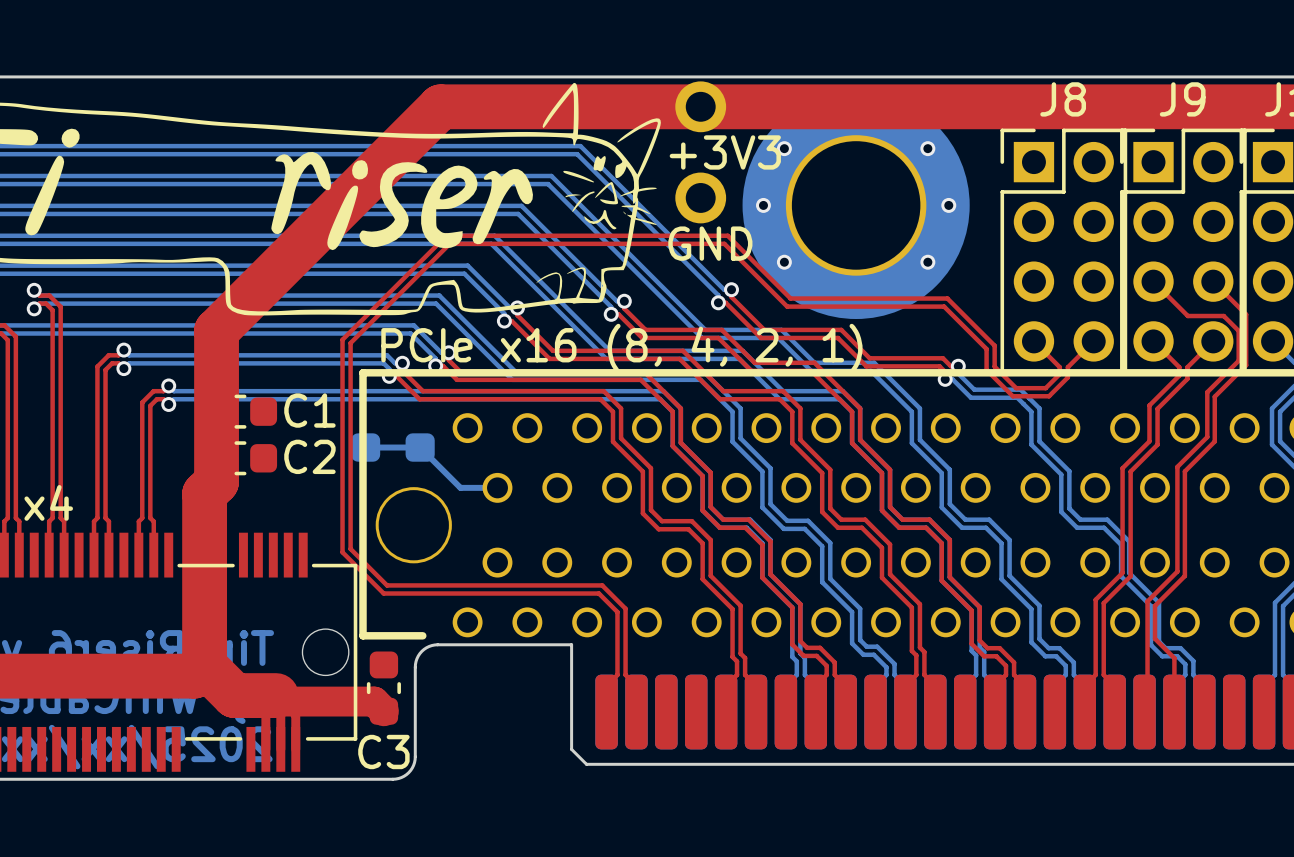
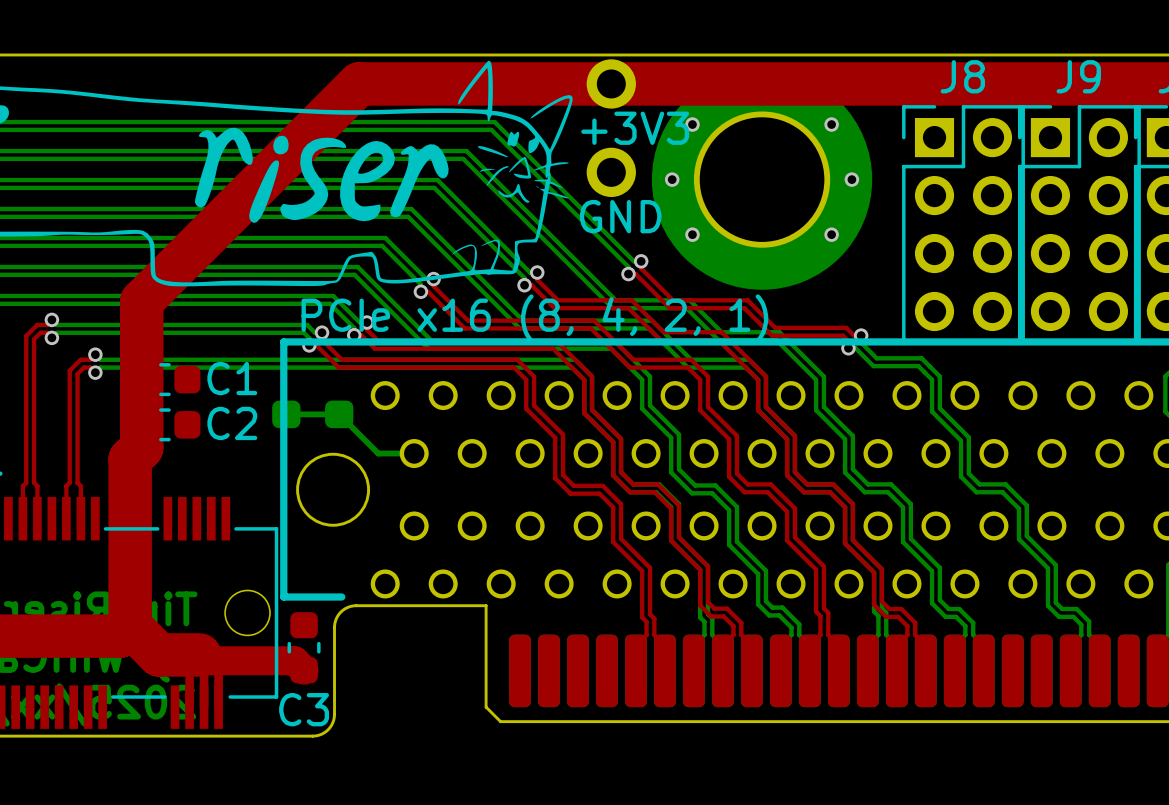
top track: (1153, 281) (1187, 316) (1223, 316) (1238, 330) (1238, 360) (1207, 392) (1207, 437) (1177, 466) (1177, 571) (1147, 601) (1147, 709) (1144, 712) -> none
top track: (1213, 281) (1246, 314) (1246, 365) (1214, 396) (1214, 441) (1184, 471) (1184, 576) (1155, 605) (1155, 638) (1174, 658) (1174, 712) -> none
top track: (1033, 341) (1059, 367) (1059, 374) (1045, 388) (1016, 388) (994, 366) (994, 345) (947, 298) (790, 298) (727, 235) (446, 235) (342, 339) (342, 552) (383, 593) (598, 593) (617, 612) (617, 674) (606, 685) (606, 712) -> none
top track: (1093, 341) (1067, 367) (1067, 377) (1049, 396) (1012, 396) (986, 369) (986, 349) (944, 306) (787, 306) (724, 243) (449, 243) (350, 343) (350, 548) (387, 585) (602, 585) (625, 608) (625, 674) (636, 685) (636, 712) -> none
top track: (1153, 341) (1179, 367) (1179, 375) (1149, 405) (1149, 441) (1122, 468) (1122, 572) (1095, 599) (1095, 674) (1084, 685) (1084, 712) -> none
top track: (1213, 341) (1187, 367) (1187, 378) (1157, 408) (1157, 444) (1130, 471) (1130, 576) (1103, 603) (1103, 674) (1114, 685) (1114, 712) -> none

